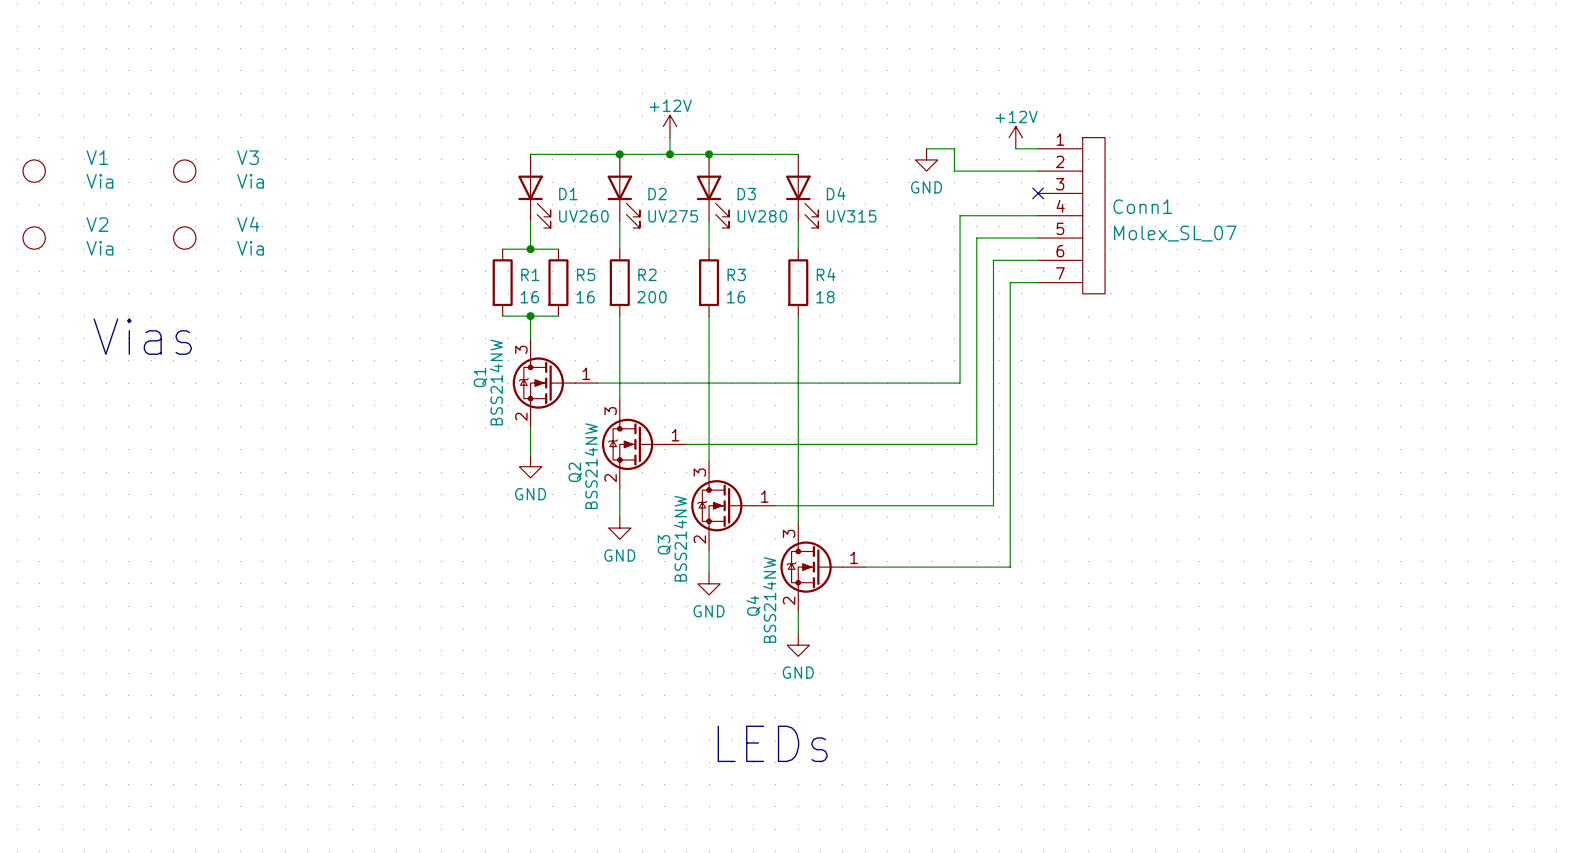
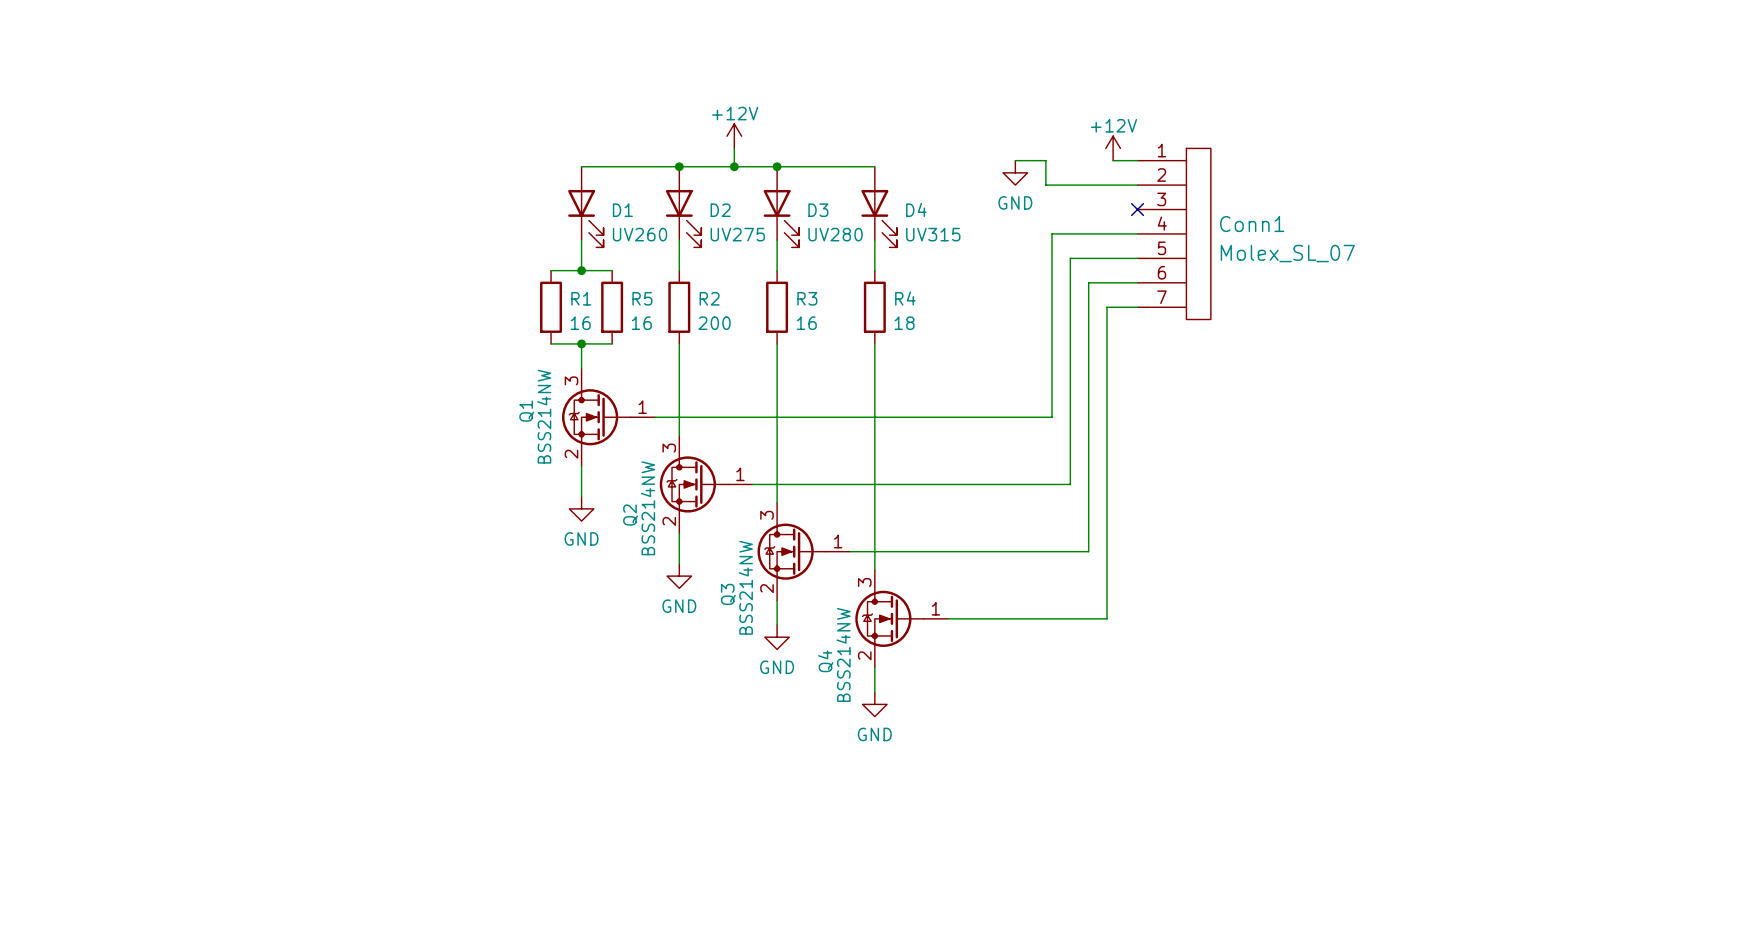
V1: Via (34, 171) -> none
V3: Via (184, 171) -> none
V2: Via (34, 238) -> none
V4: Via (184, 238) -> none
text: Vias (142, 336) -> none
text: LEDs (772, 743) -> none

